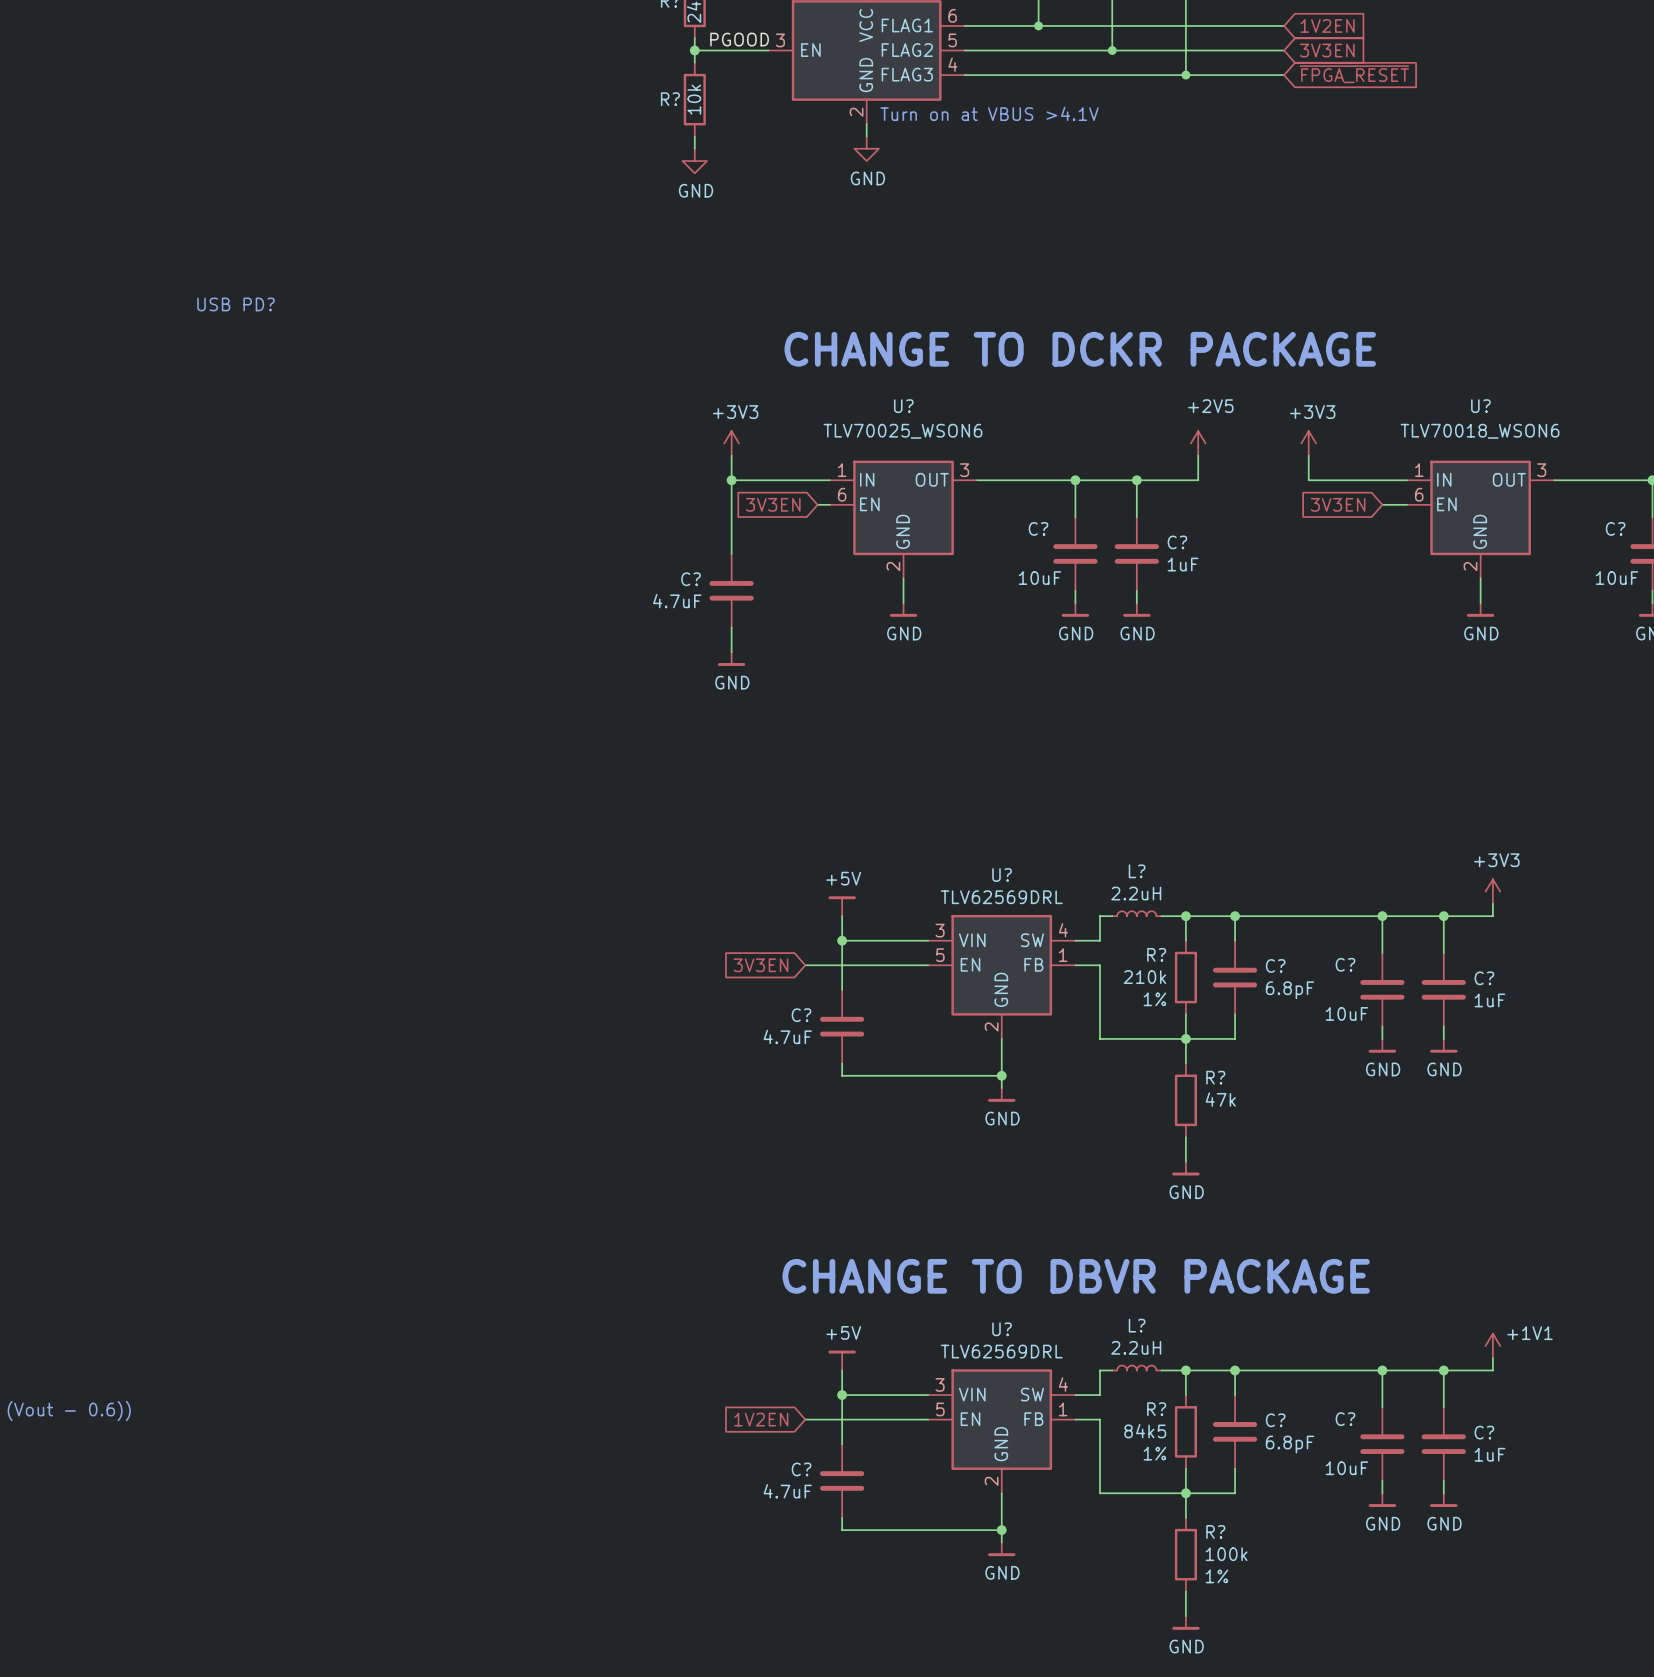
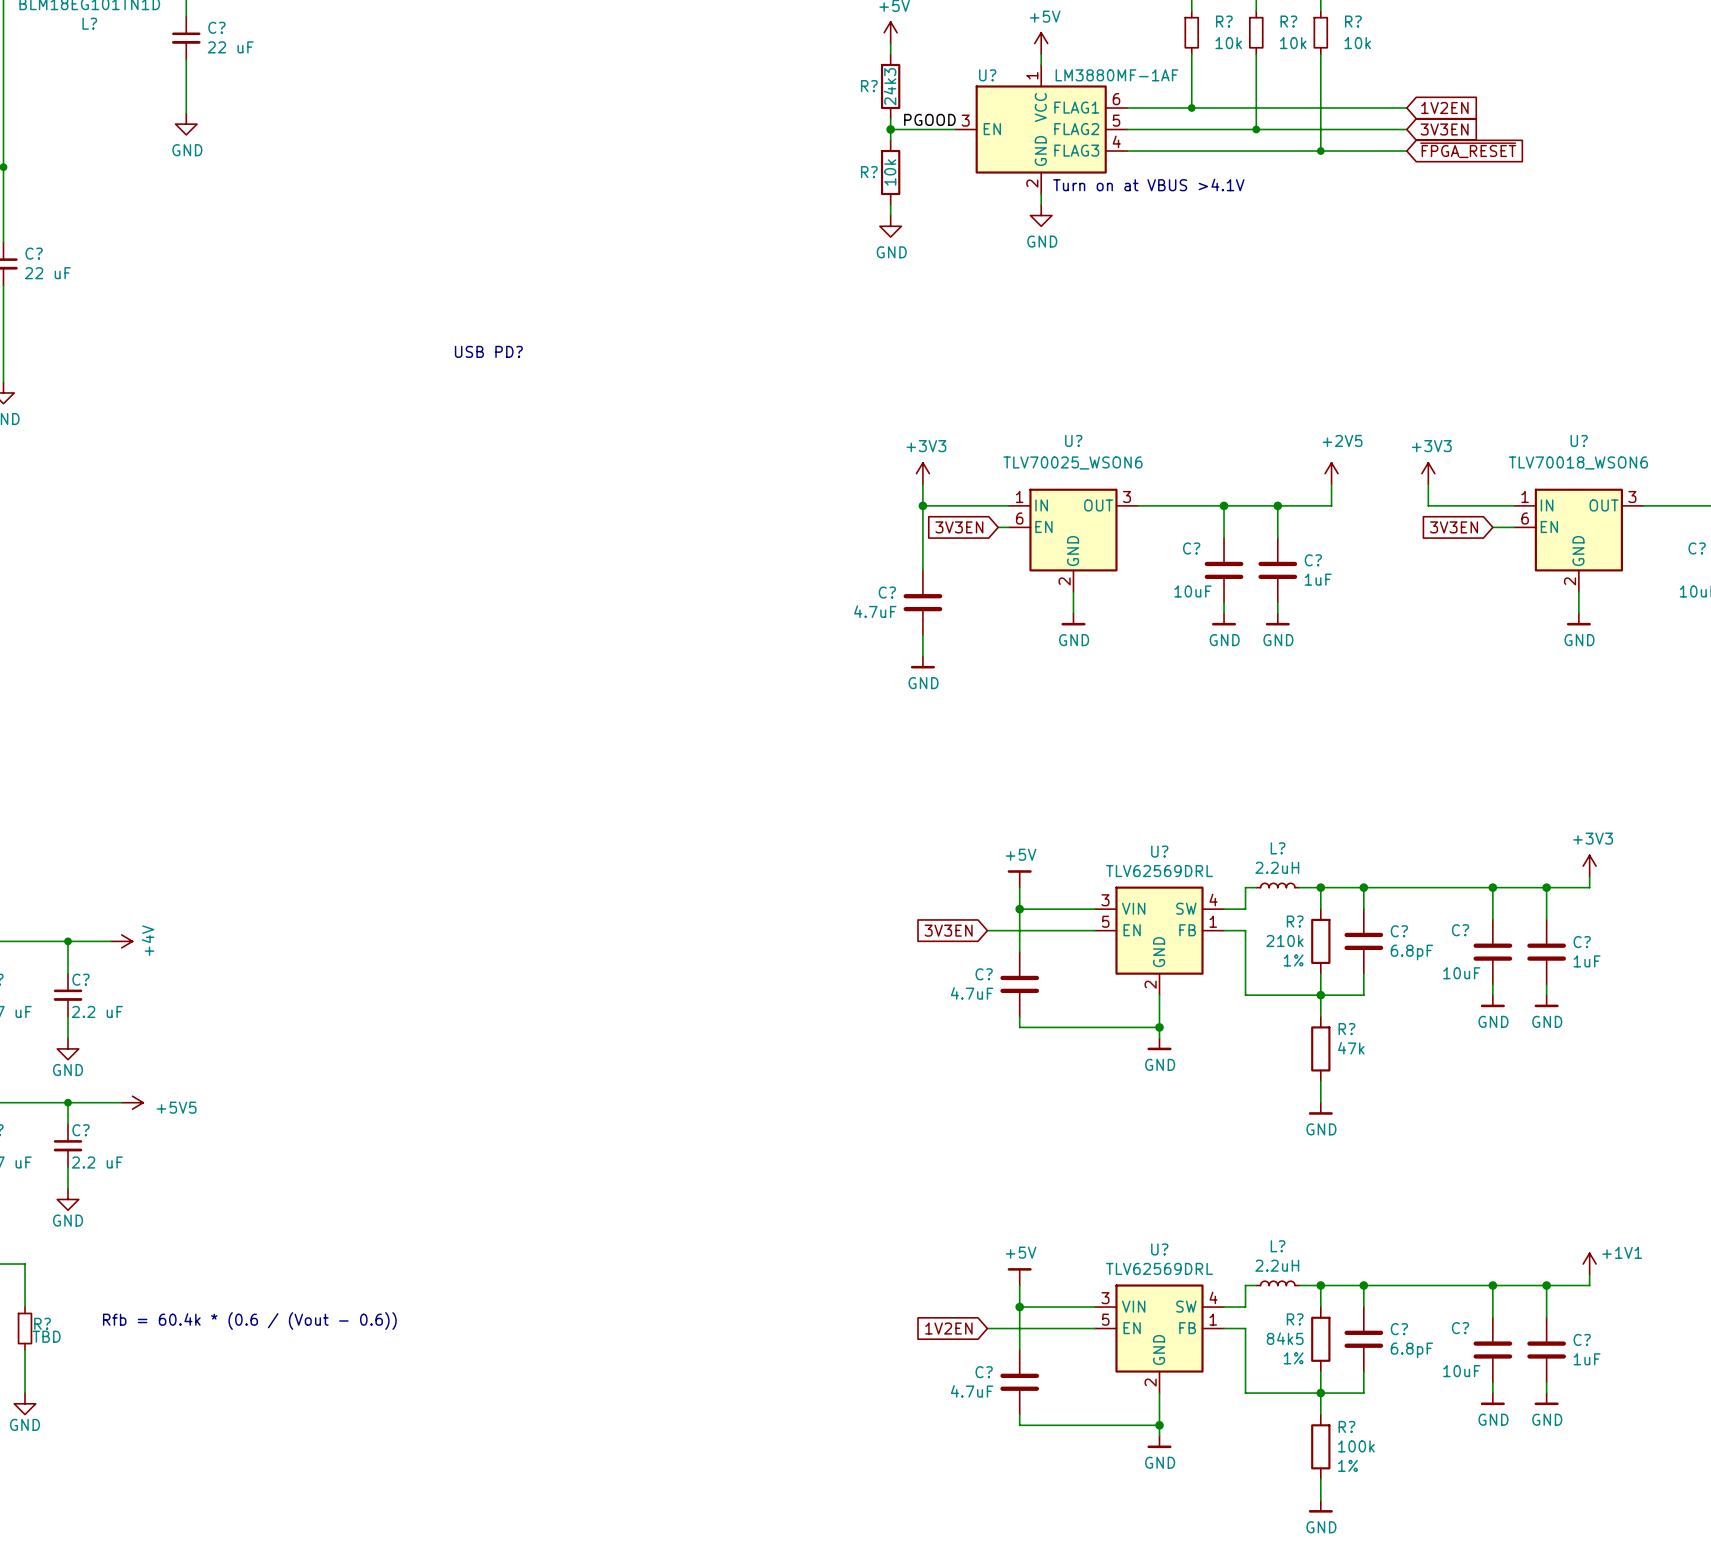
text: CHANGE TO DCKR PACKAGE (1080, 349) -> none
text: CHANGE TO DBVR PACKAGE (1076, 1276) -> none

